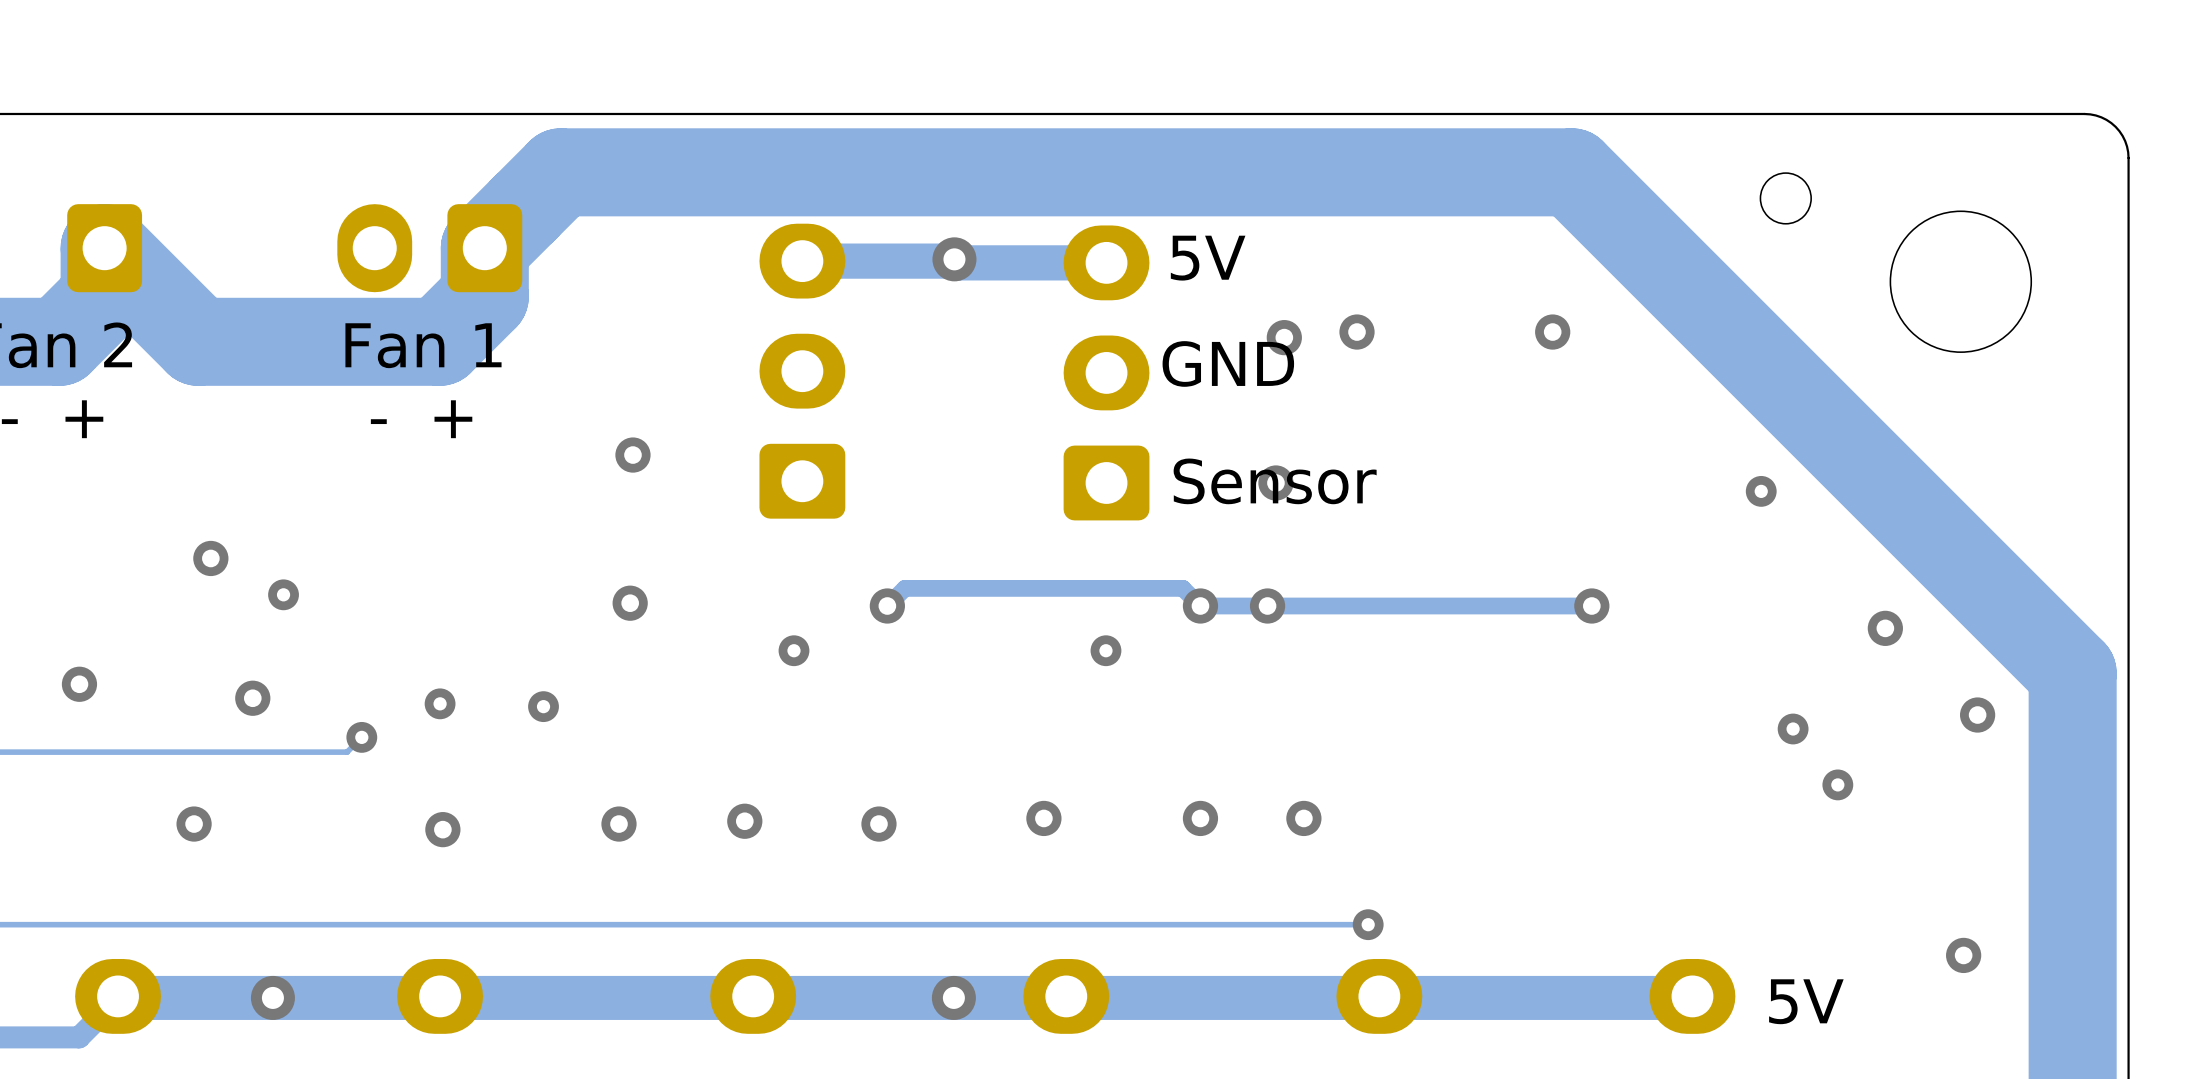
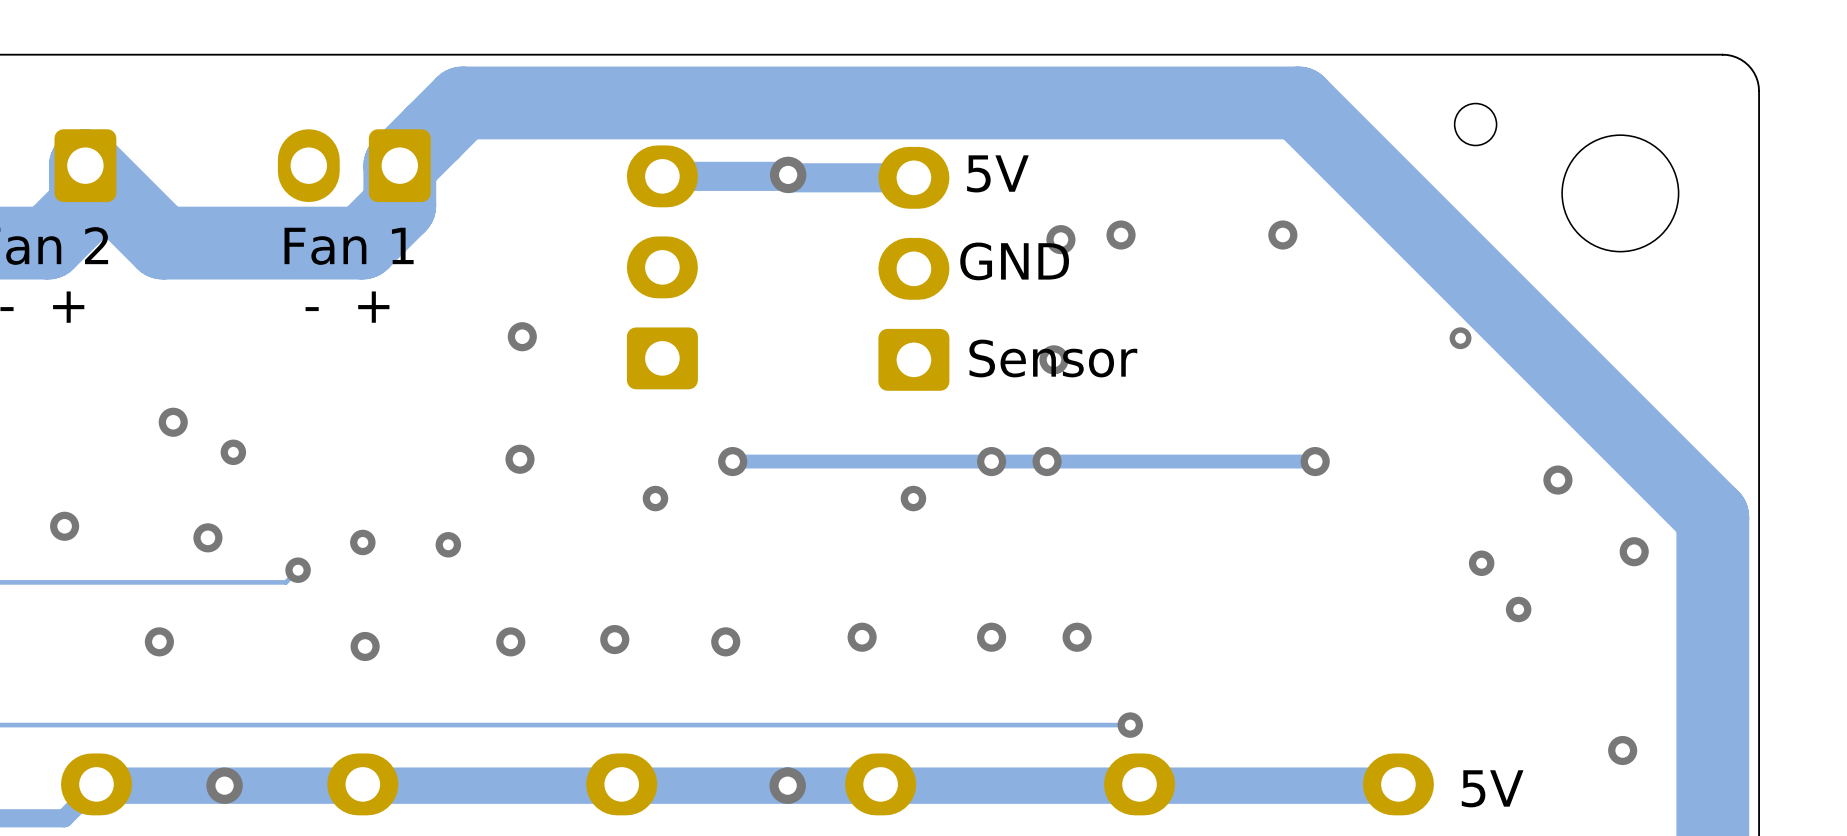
via: none -> (1460, 338)
via: (1761, 491) -> none
track: (1200, 605) (1182, 588) (904, 588) (887, 605) -> (991, 461) (732, 461)

